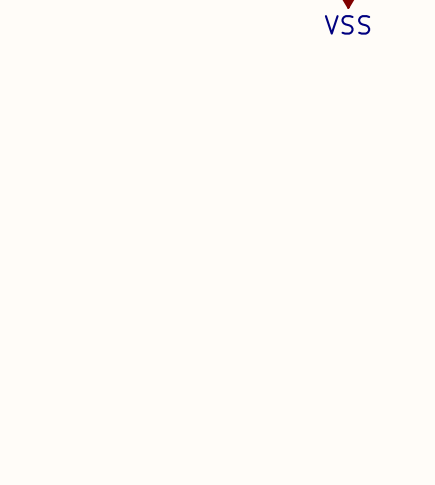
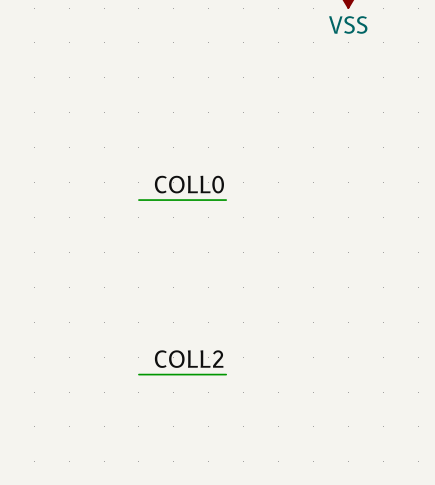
label: none -> COLL0 (189, 184)
wire: none -> (138, 200) (226, 200)
label: none -> COLL2 (189, 359)
wire: none -> (138, 374) (226, 374)

